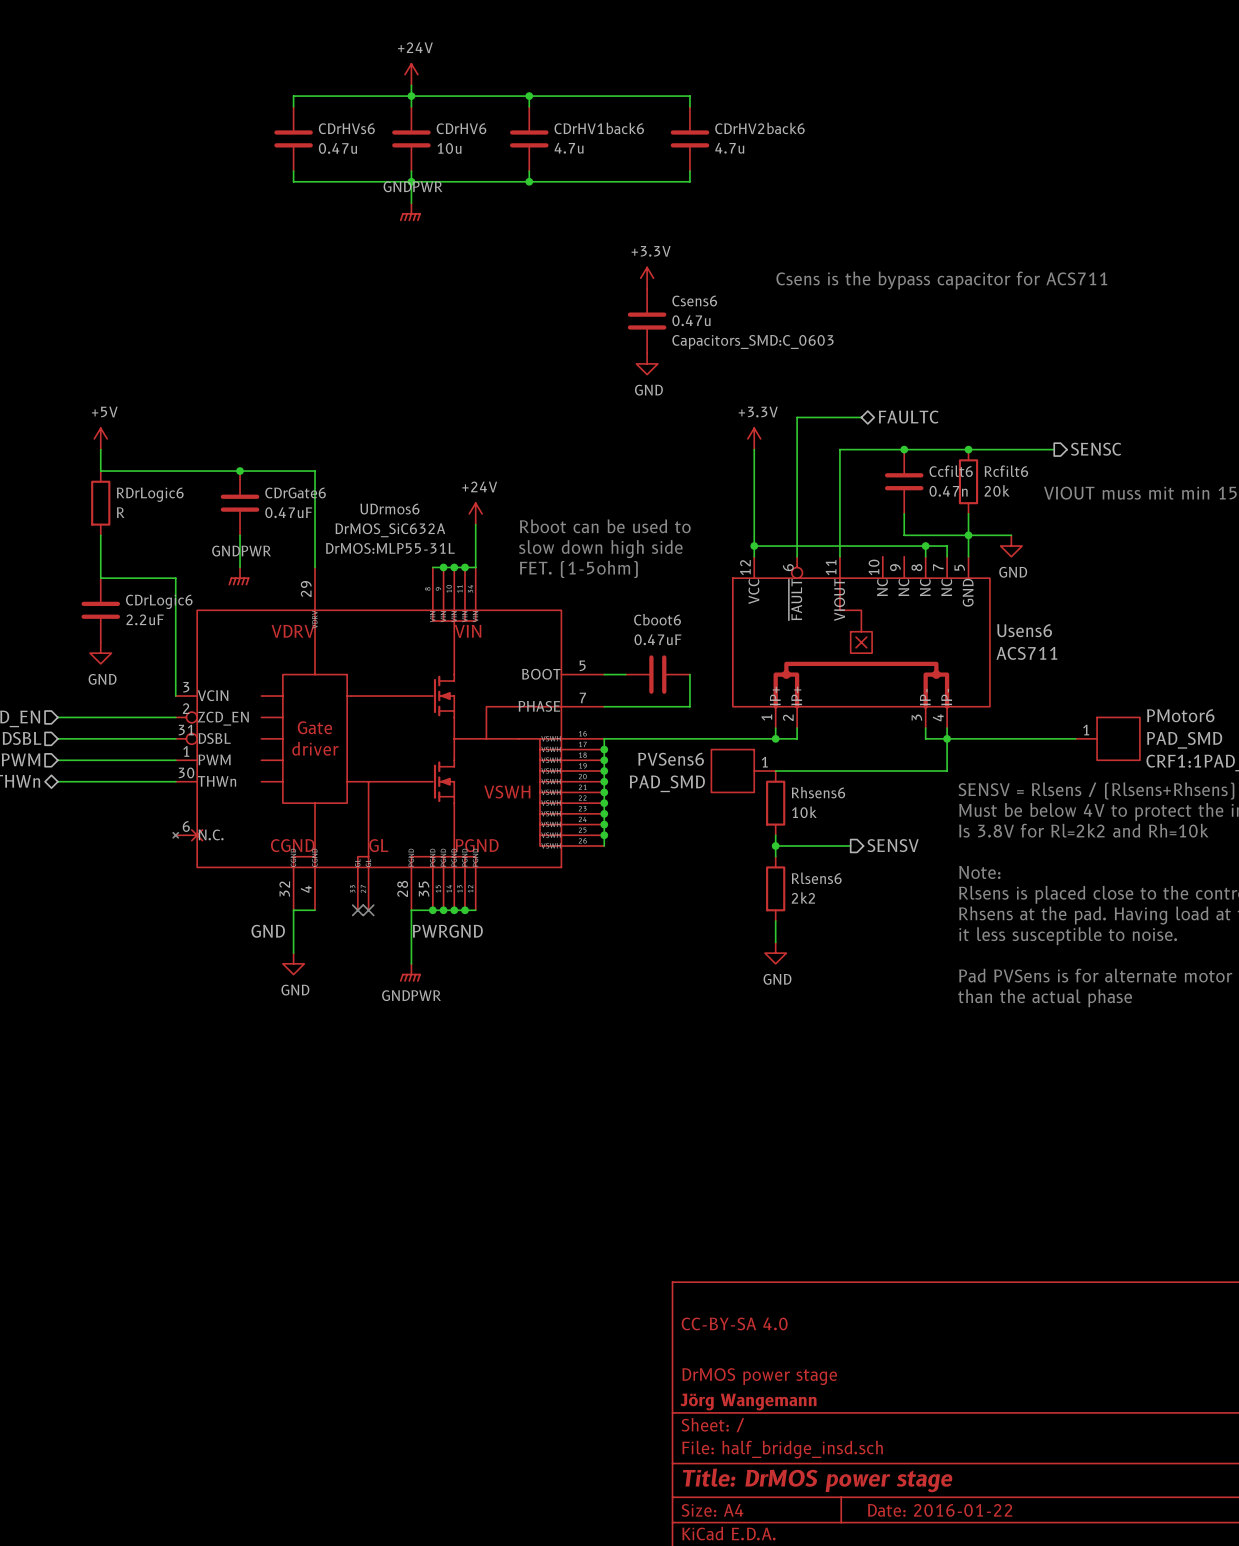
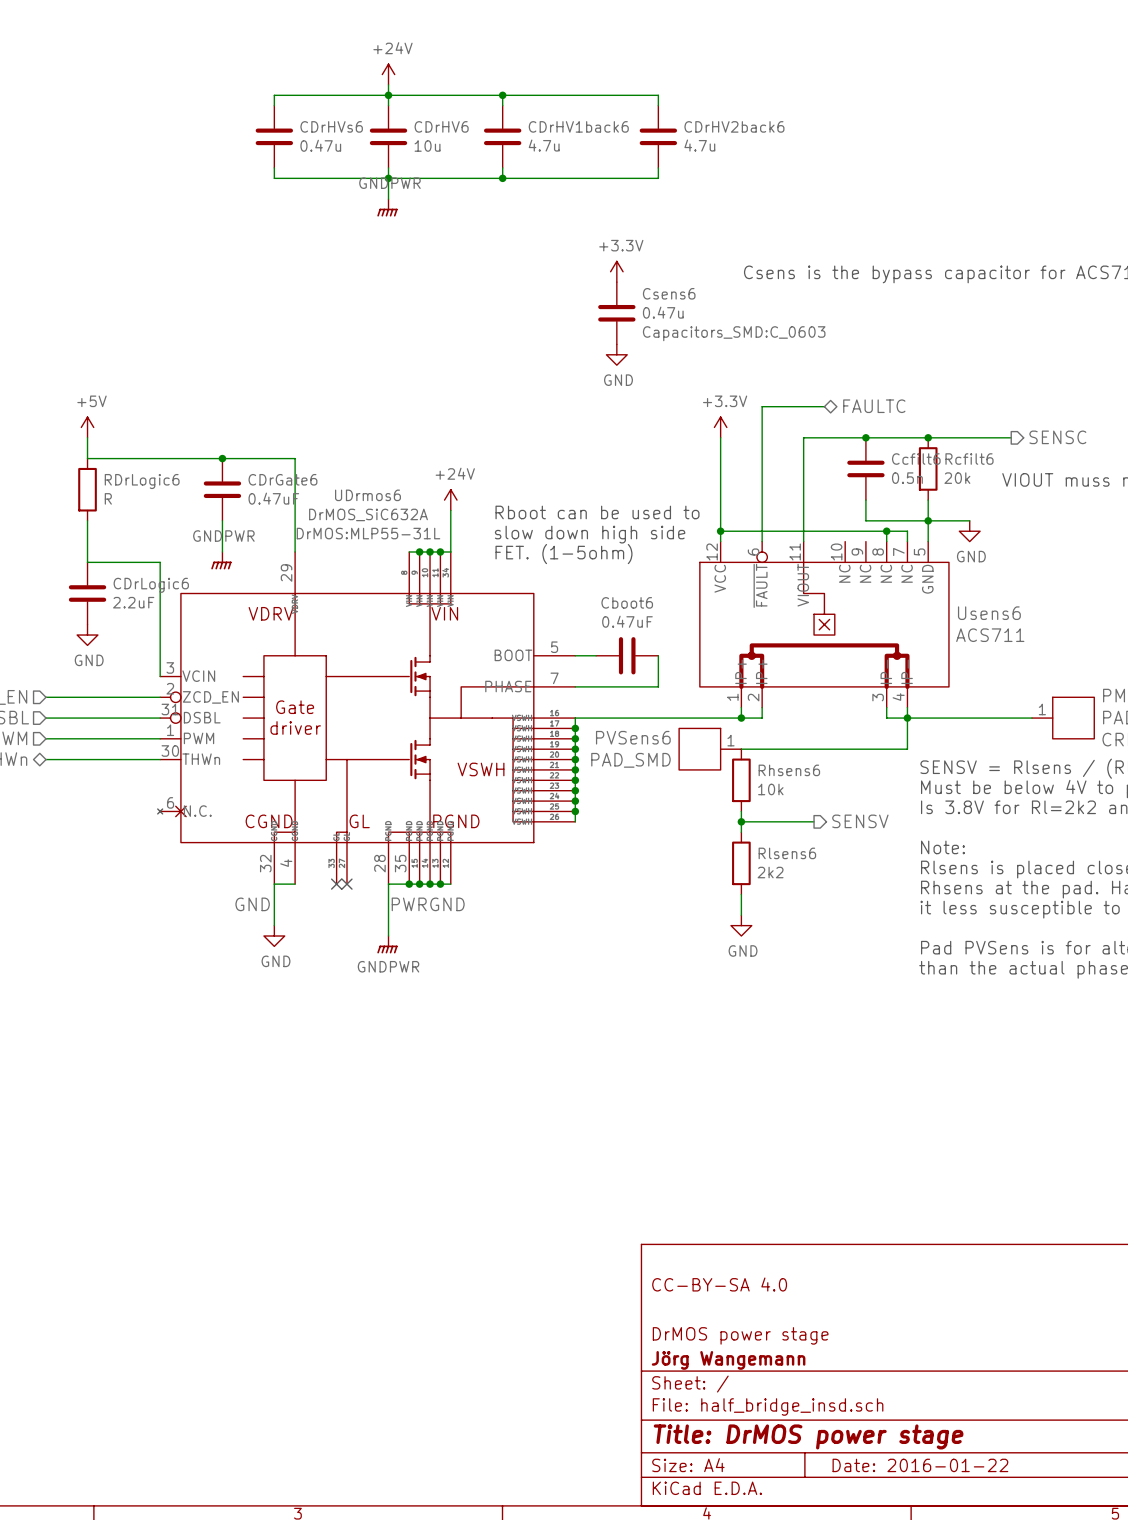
Ccfilt6 value: 0.47n (948, 491) -> 0.5n (907, 478)

